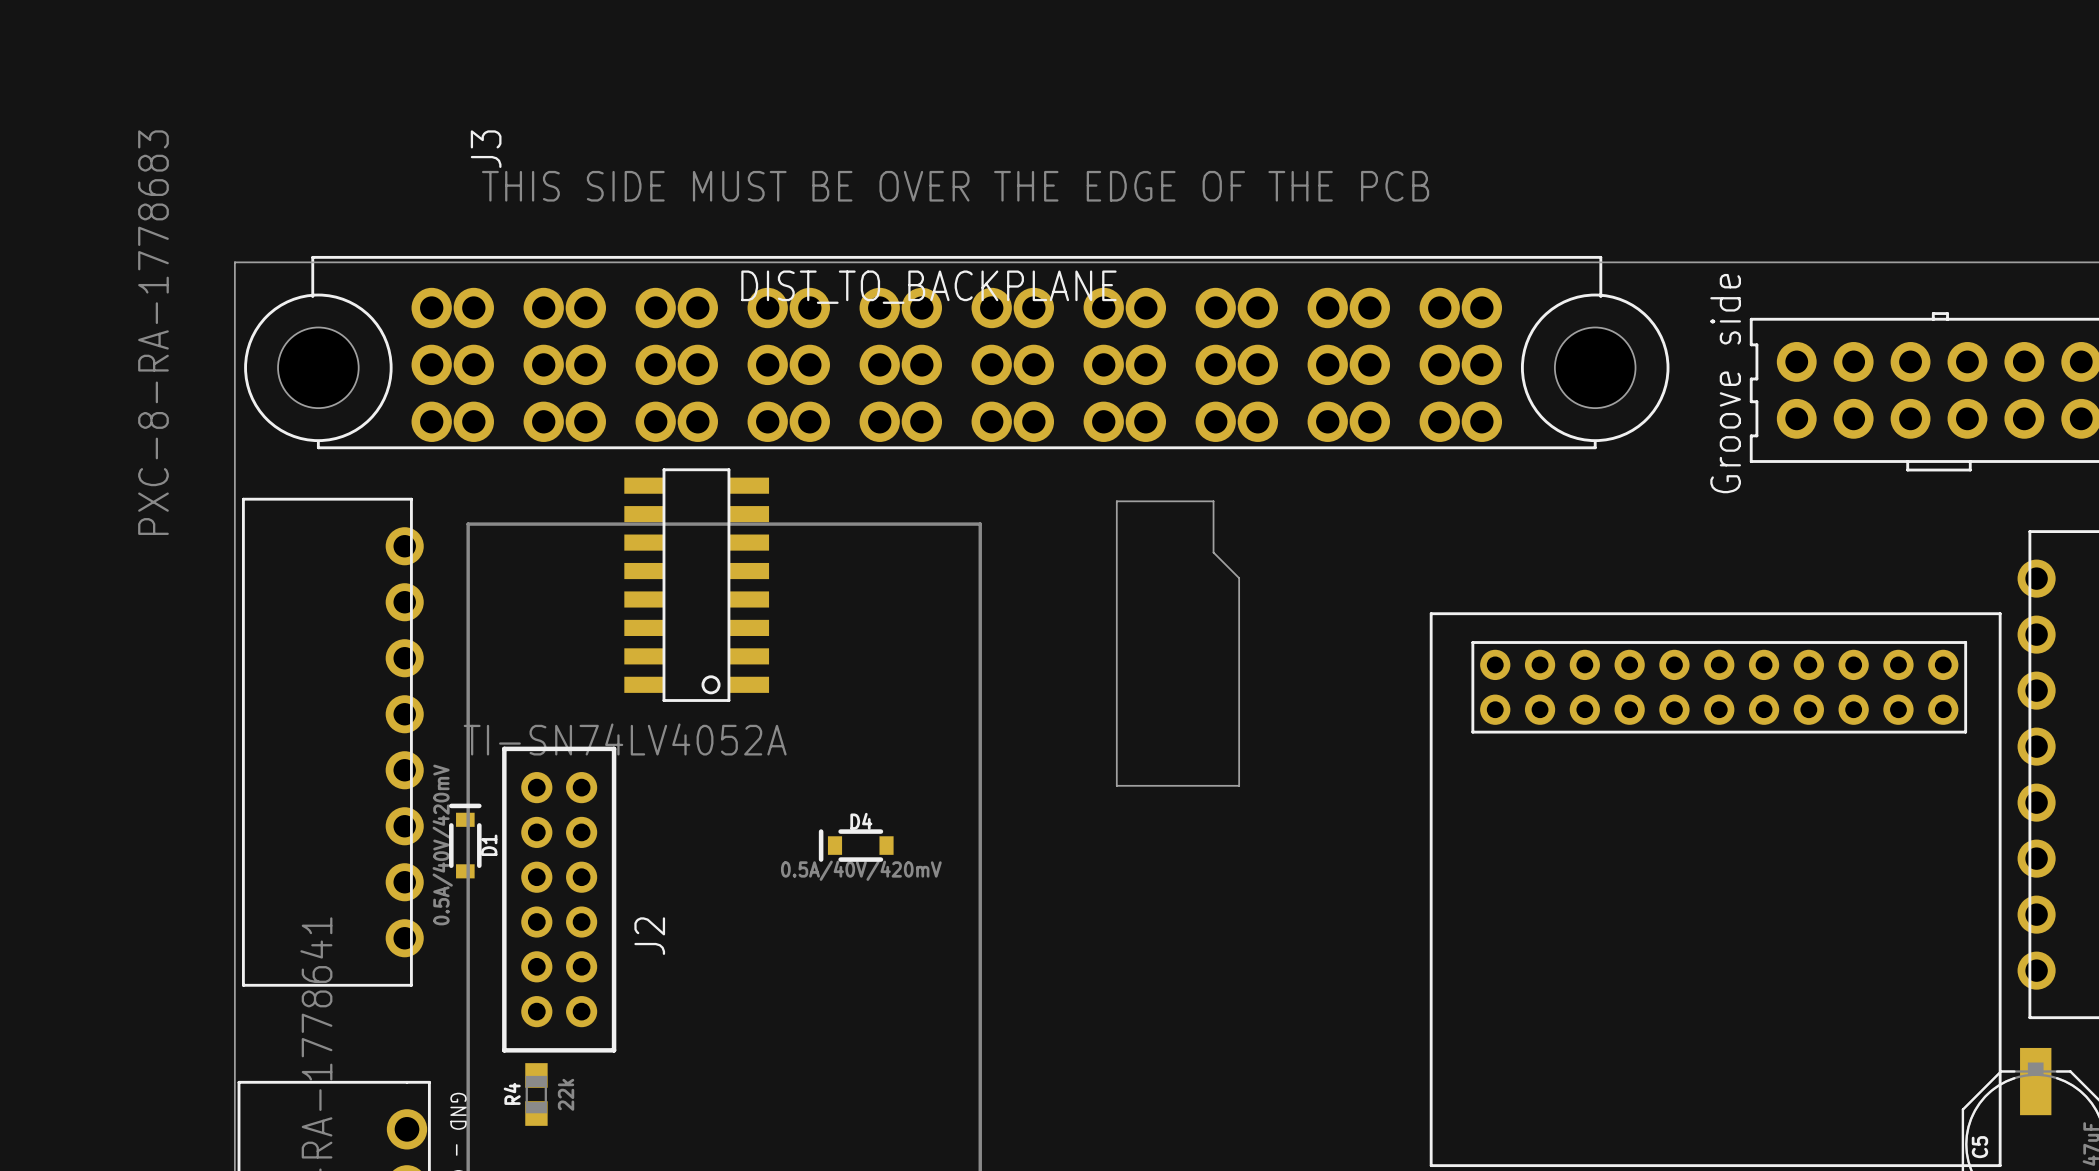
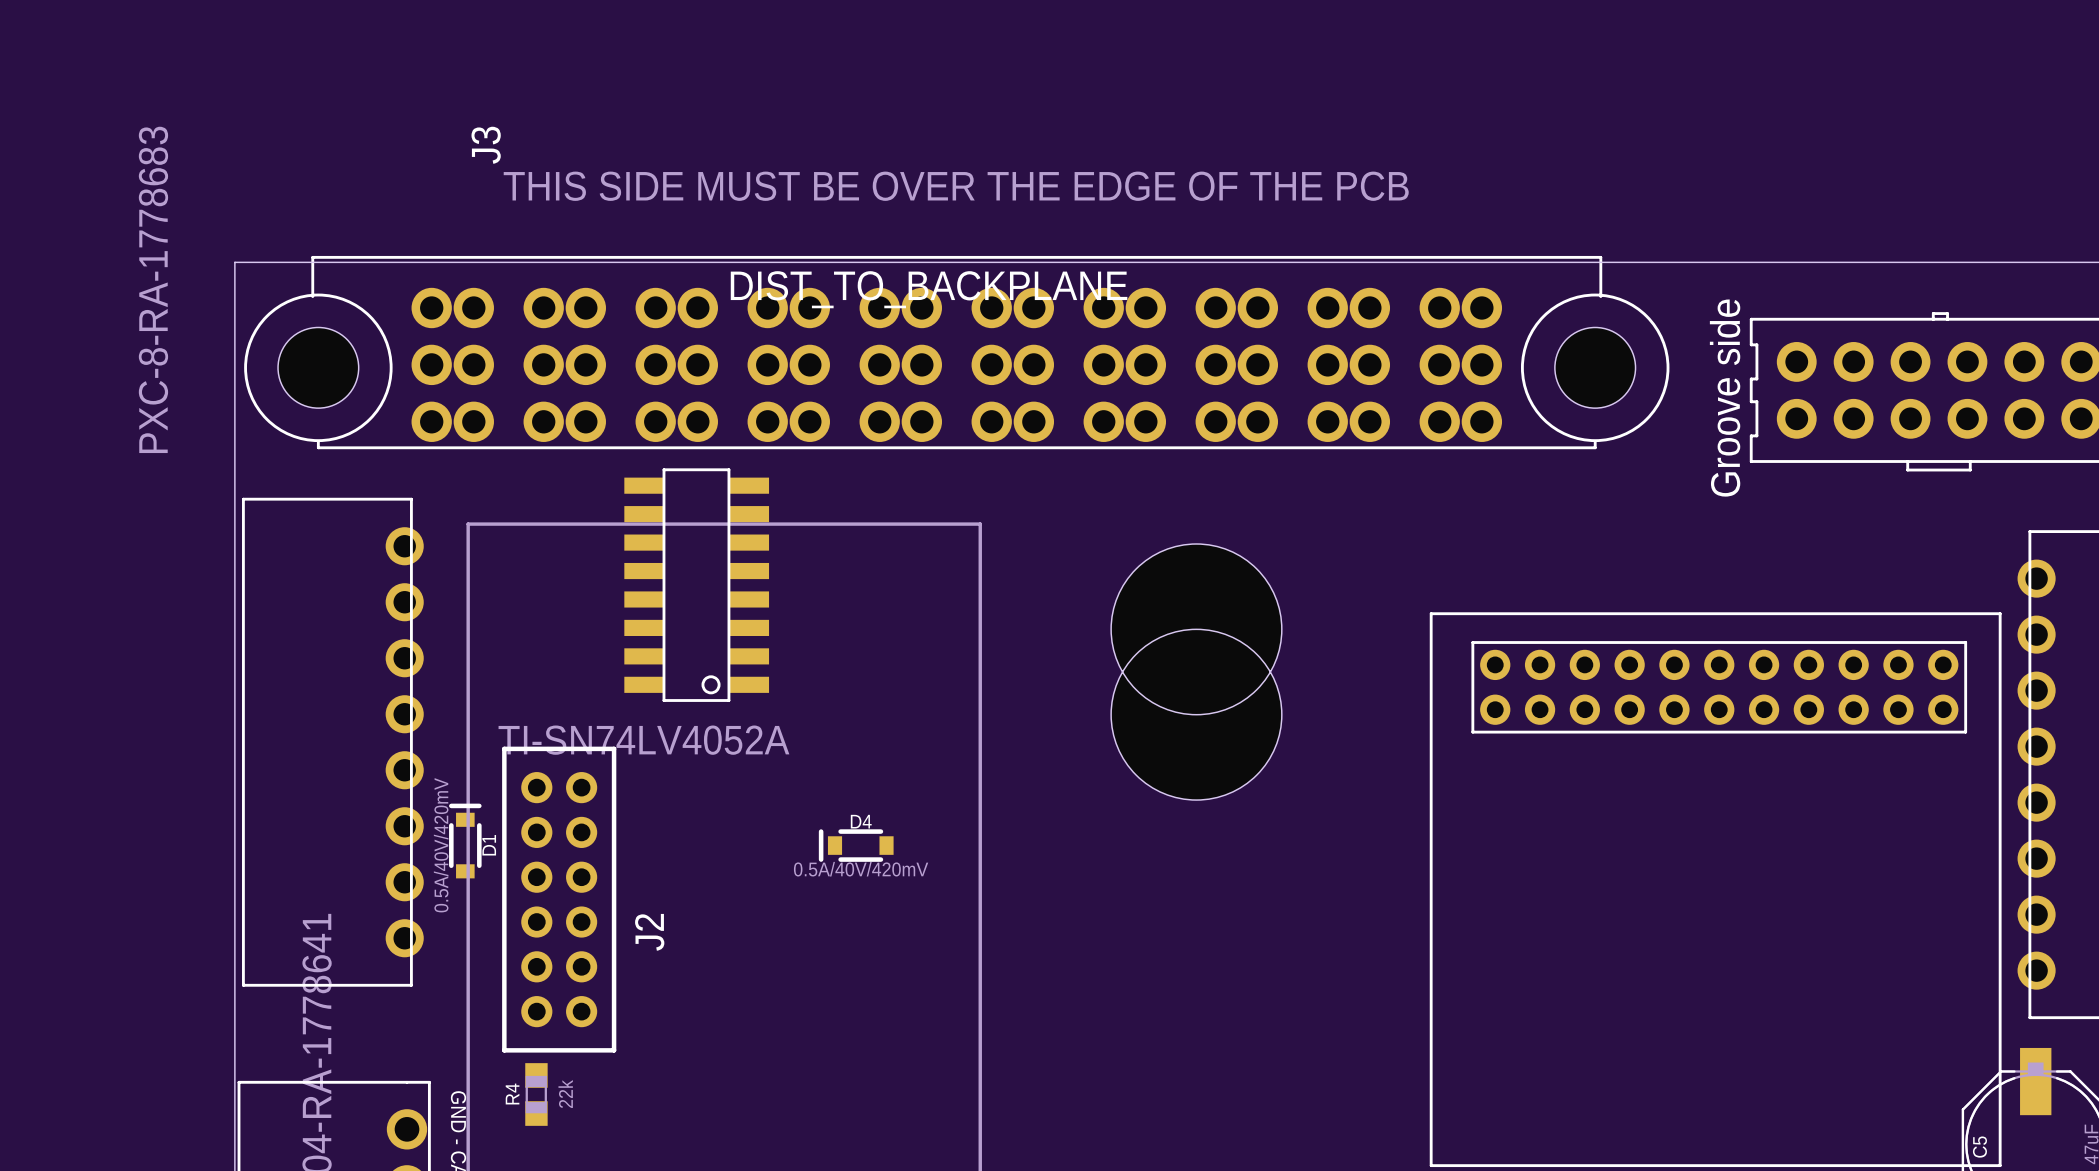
board edge: (1116, 501) (1116, 785) (1239, 785) (1239, 578) (1213, 552) (1213, 501) (1116, 501) -> none
hole: none -> (1196, 629)
hole: none -> (1196, 714)

